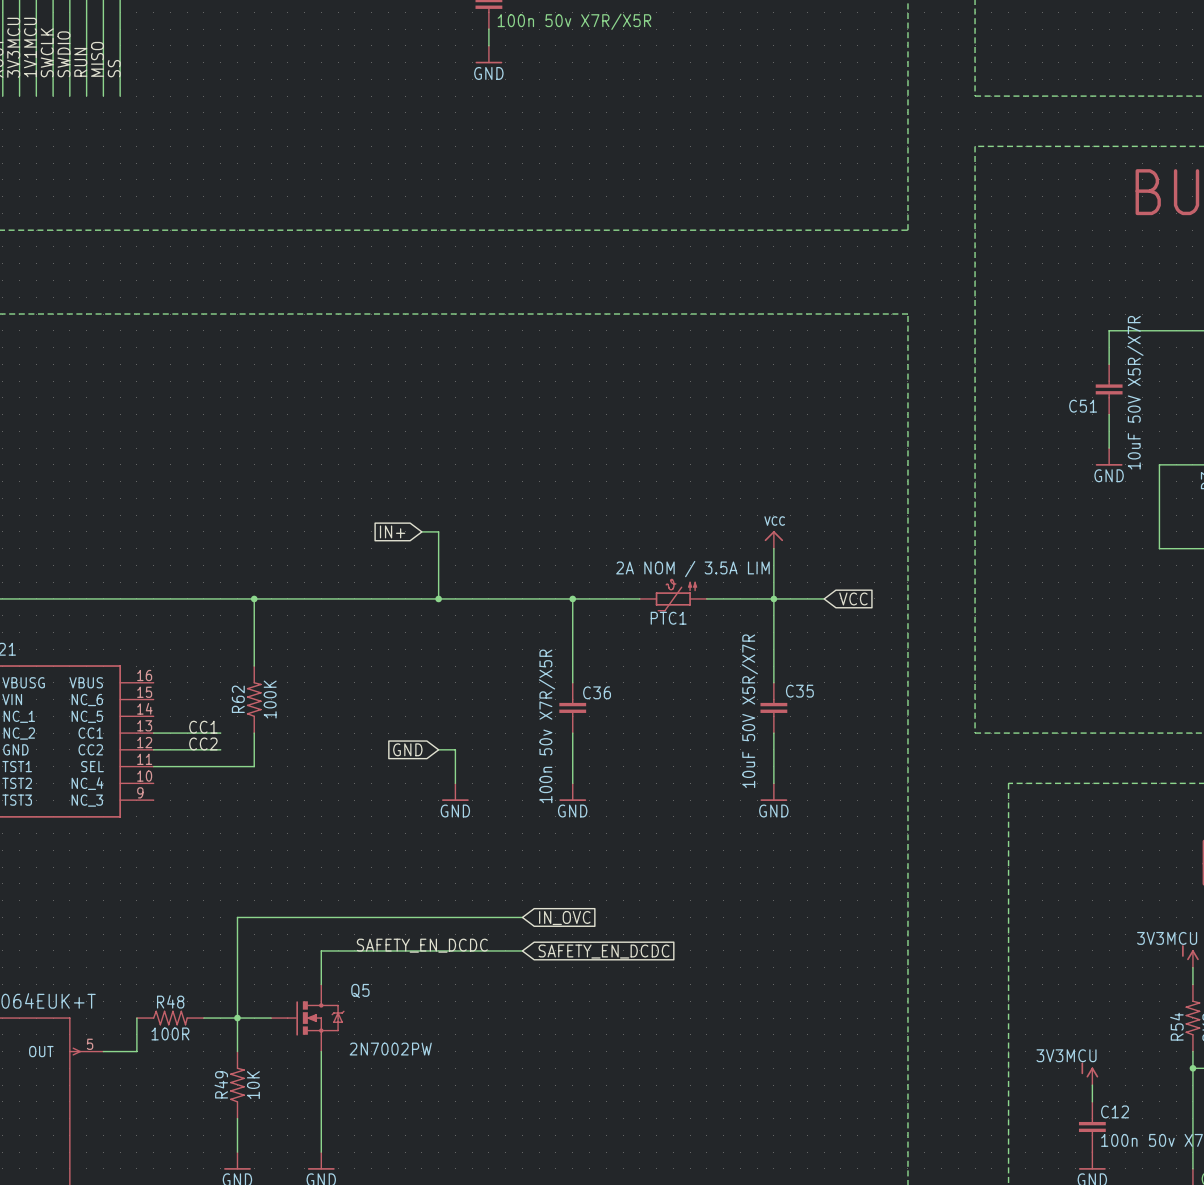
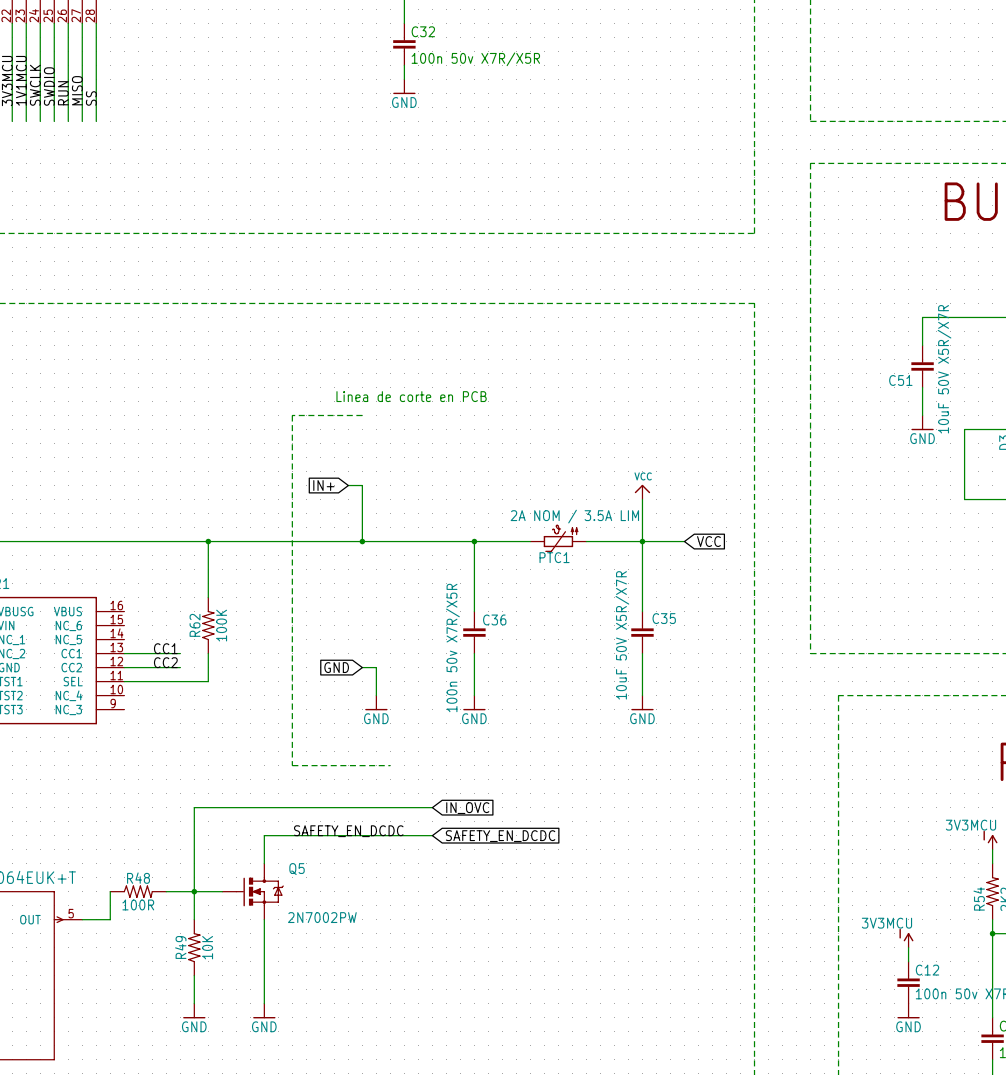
text: none -> Linea de corte en PCB (411, 396)
wire: none -> (362, 415) (292, 415) (292, 765) (390, 765)

